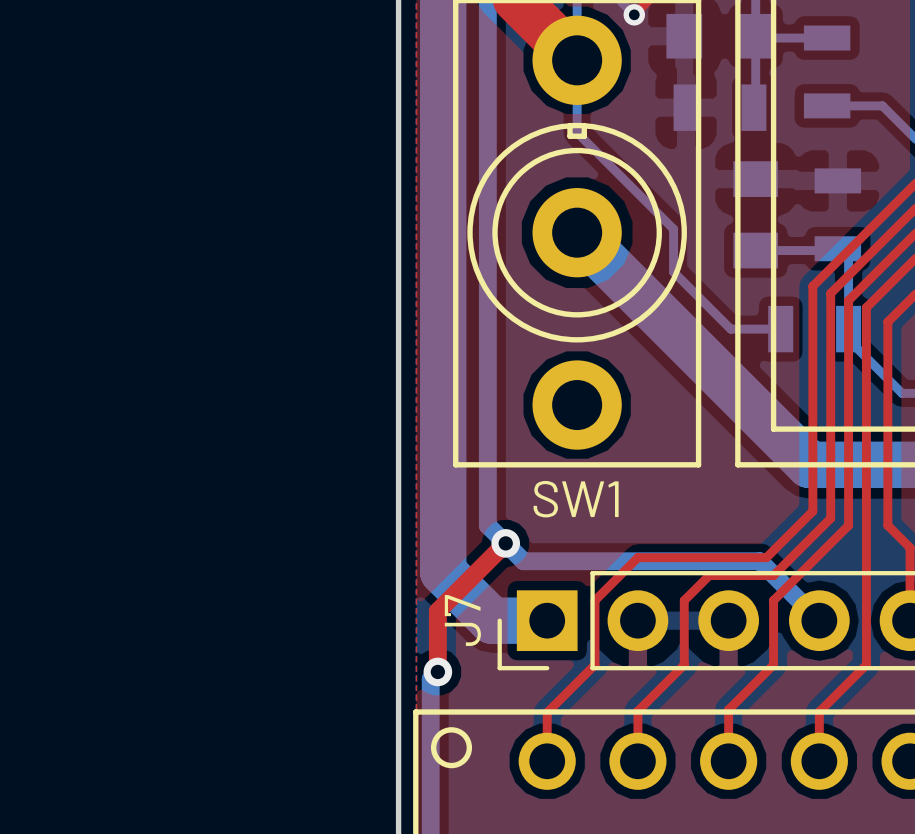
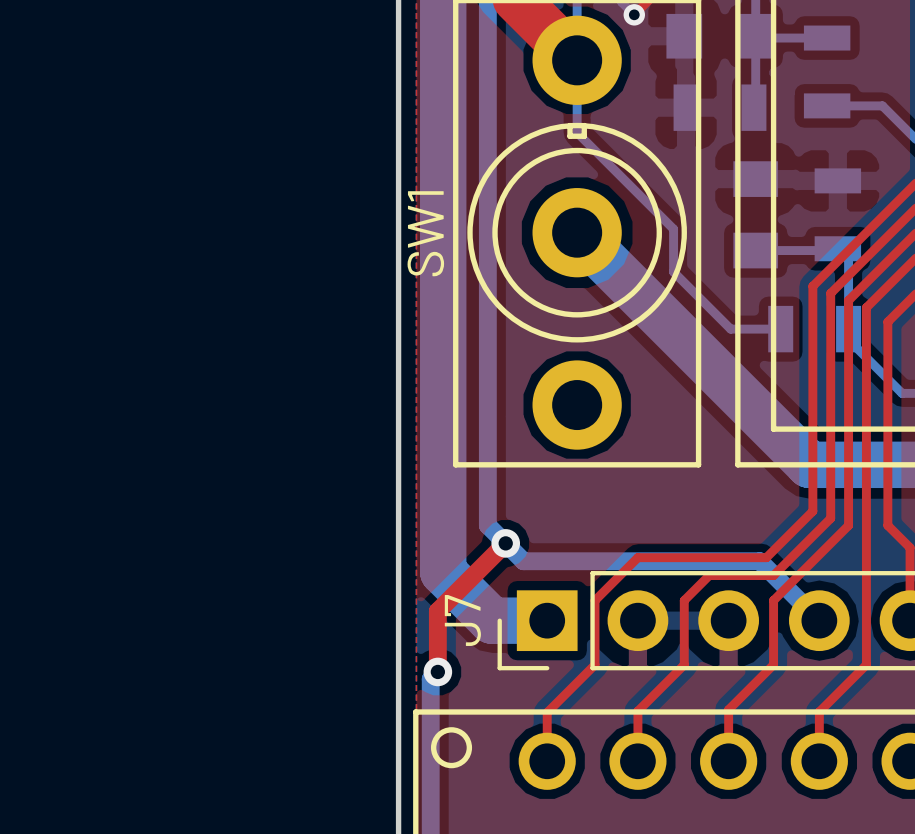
SW1 name rotation: 0° (576, 499) -> 90° counterclockwise (425, 233)
SW1 name position: SW1 (576, 499) -> SW1 (425, 233)

